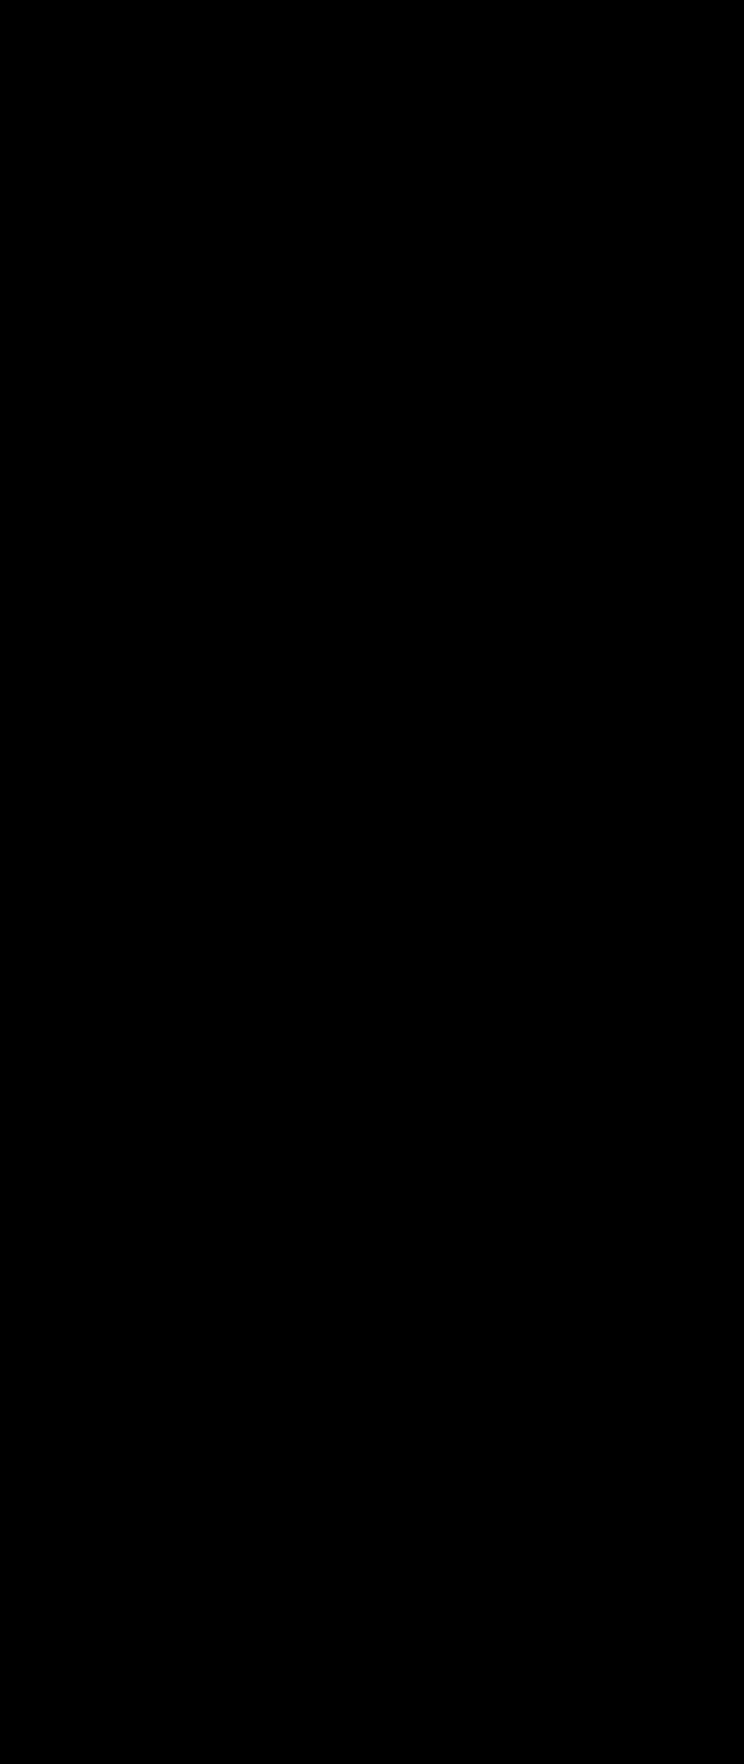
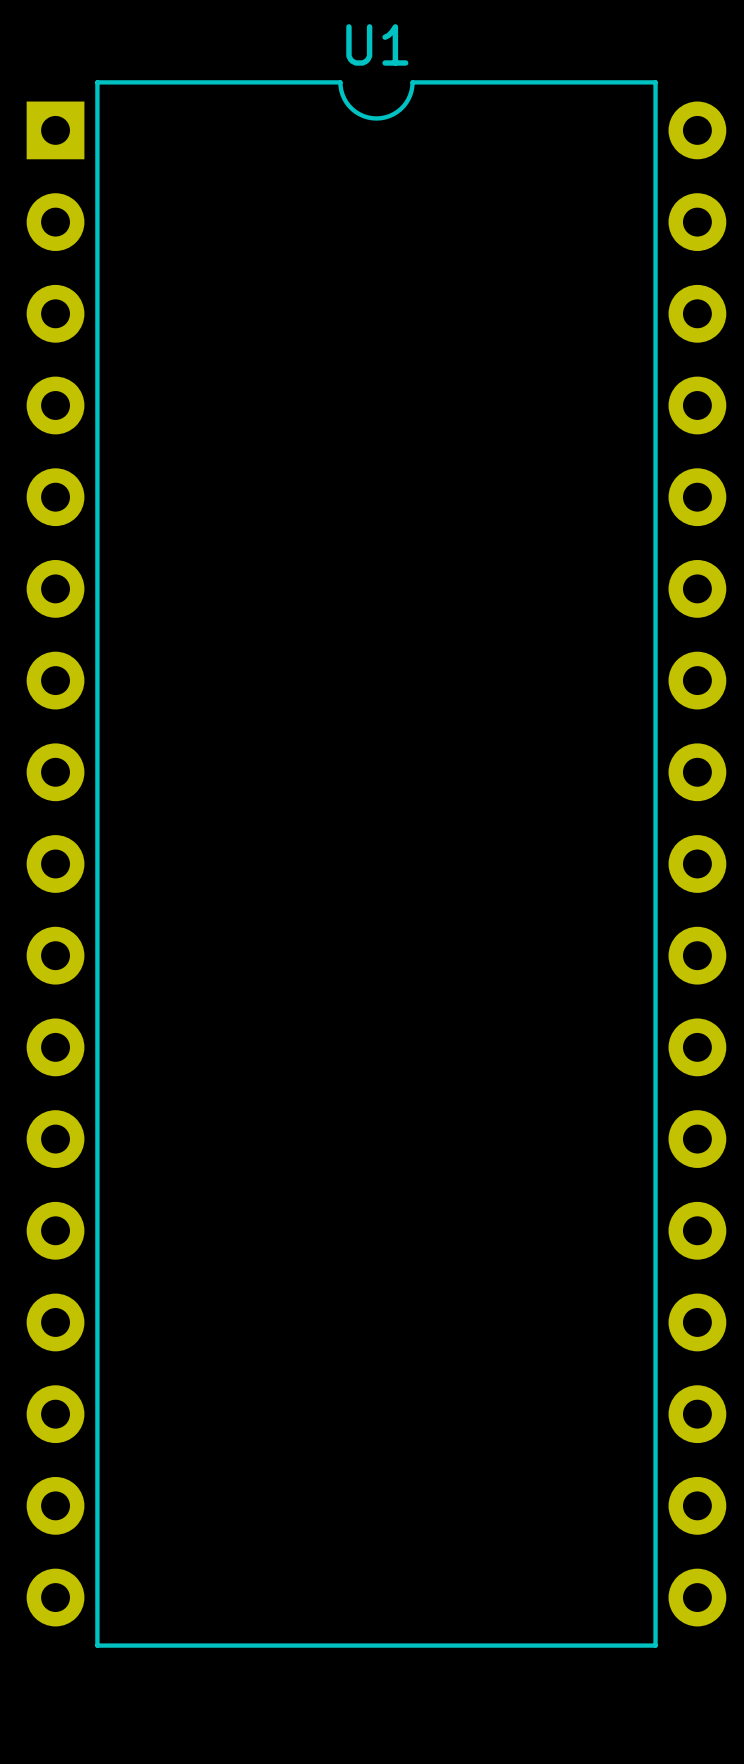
U1: none -> (376, 863)

